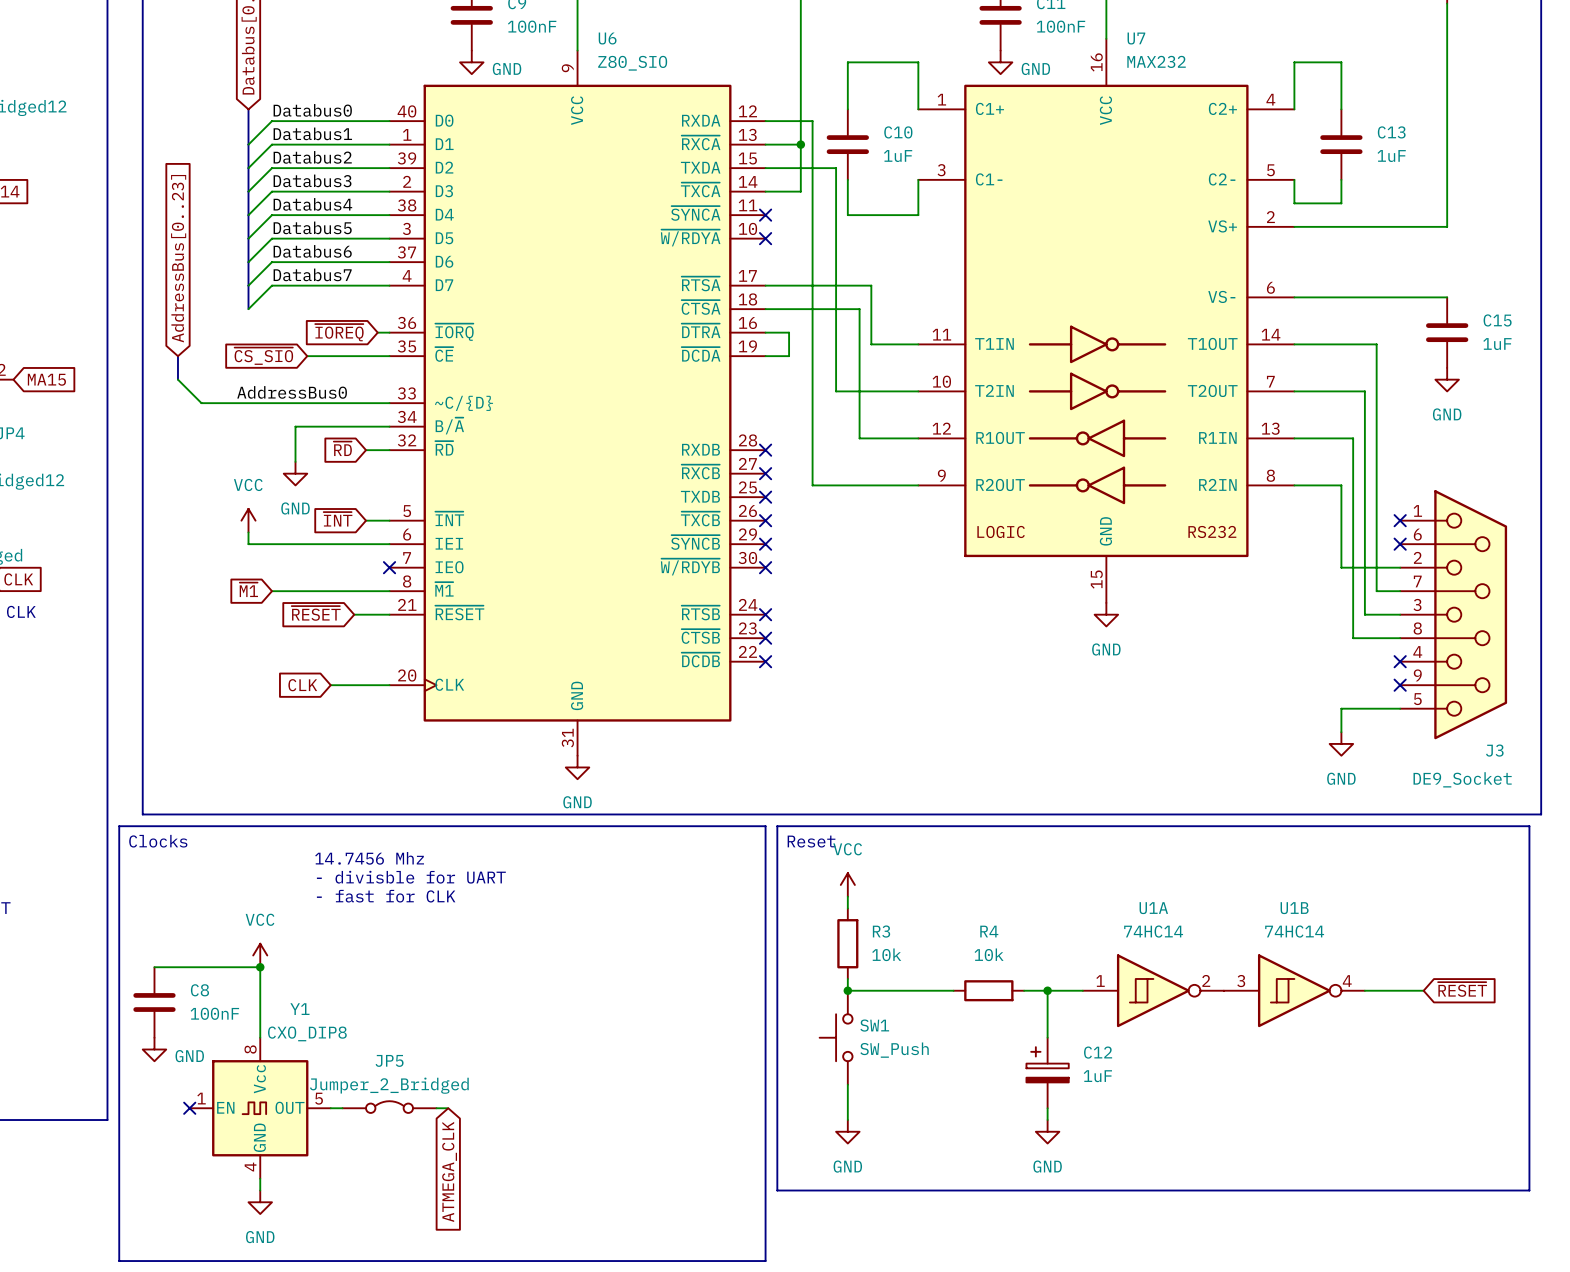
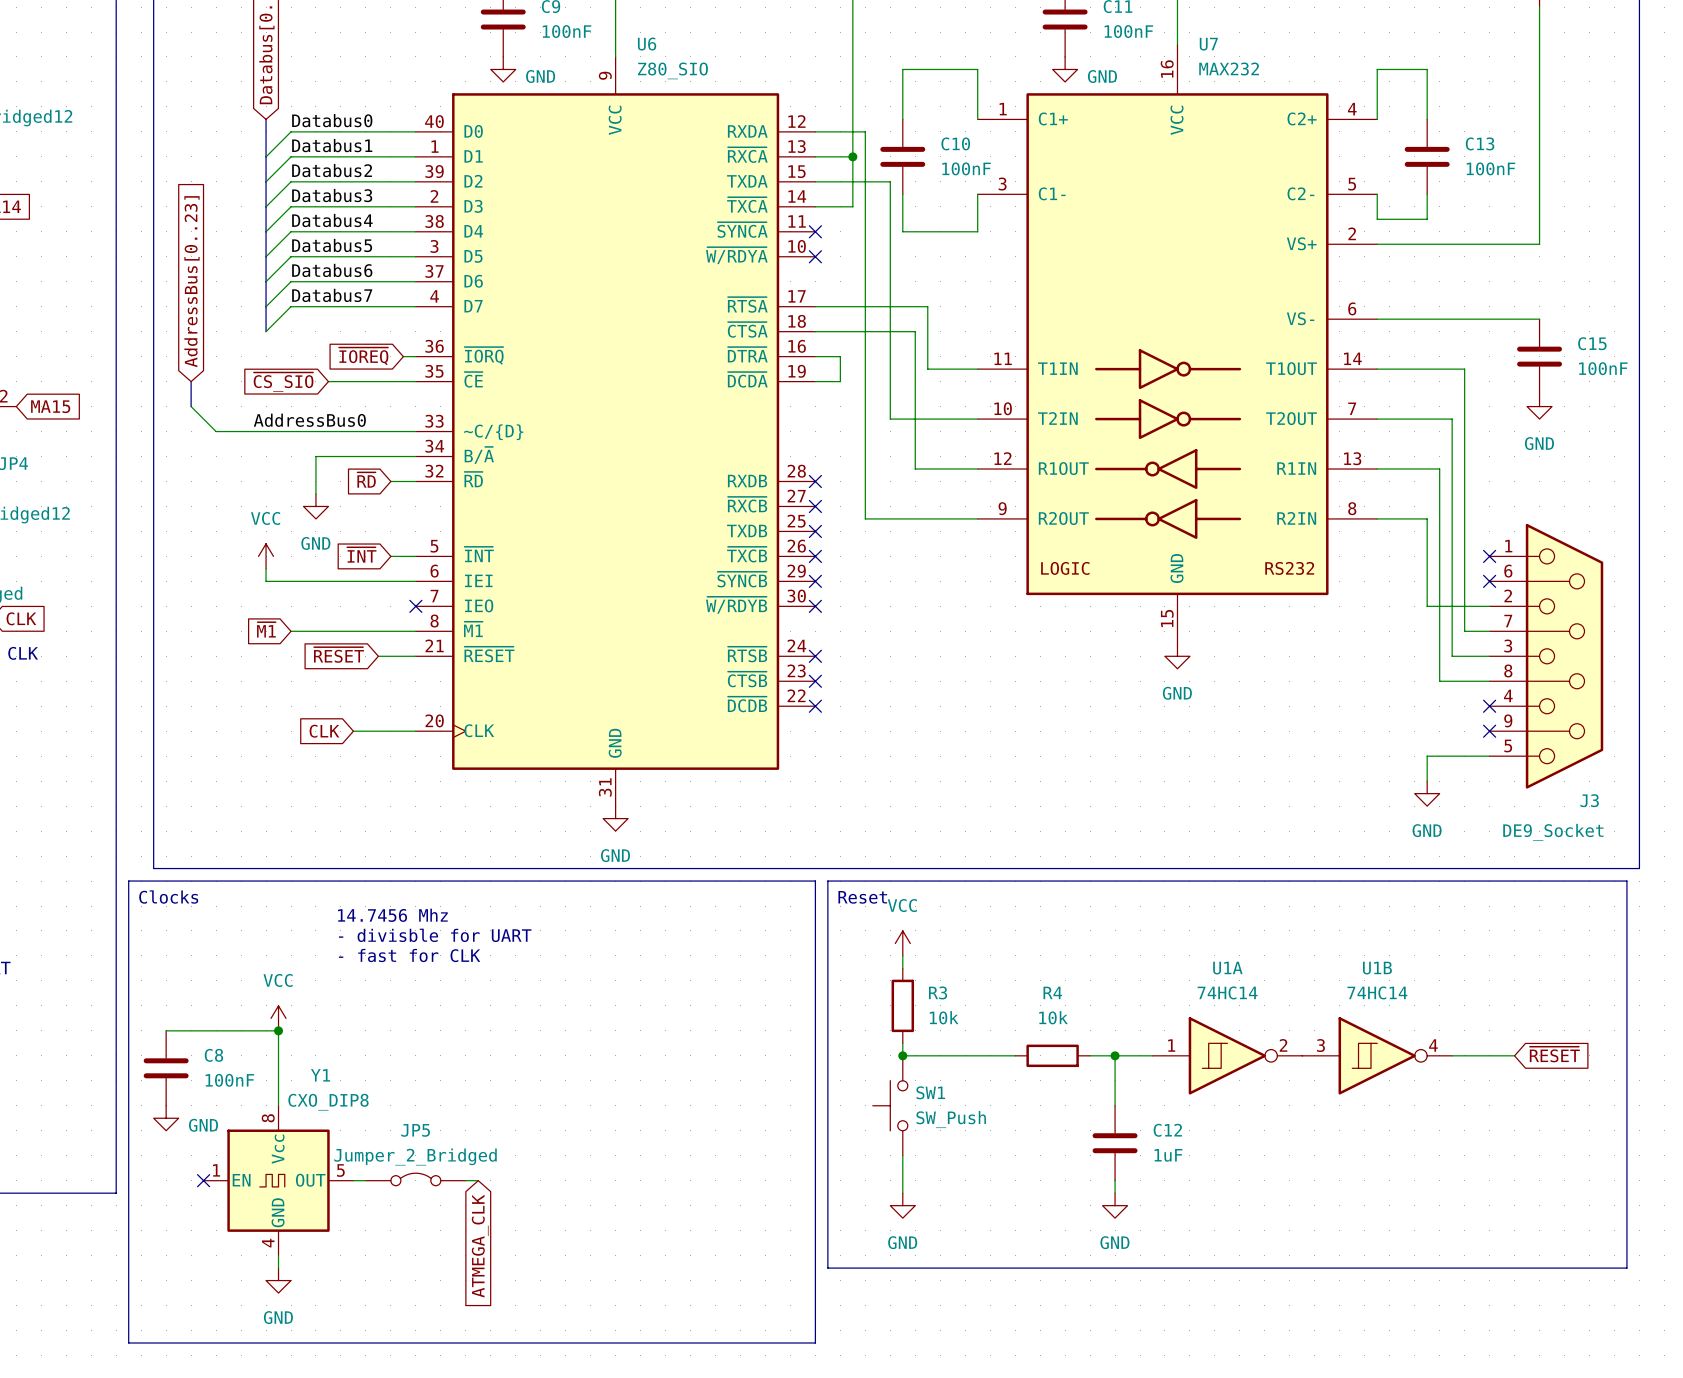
C10 value: 1uF (898, 156) -> 100nF (966, 168)
C13 value: 1uF (1391, 156) -> 100nF (1490, 168)
C15 value: 1uF (1497, 344) -> 100nF (1603, 368)
C12 symbol: [1026, 1037, 1069, 1109] -> [1092, 1105, 1138, 1181]

